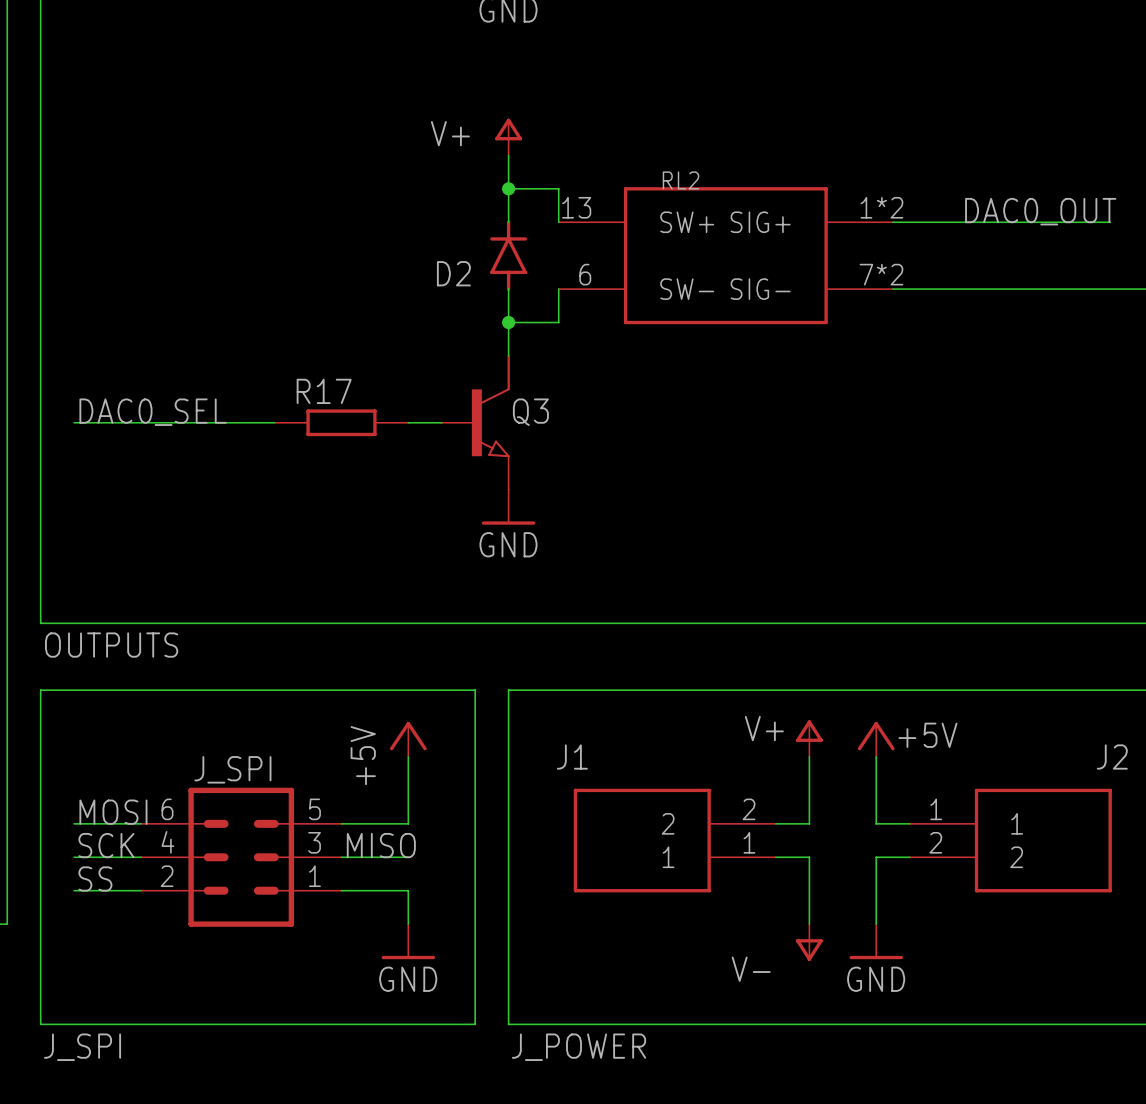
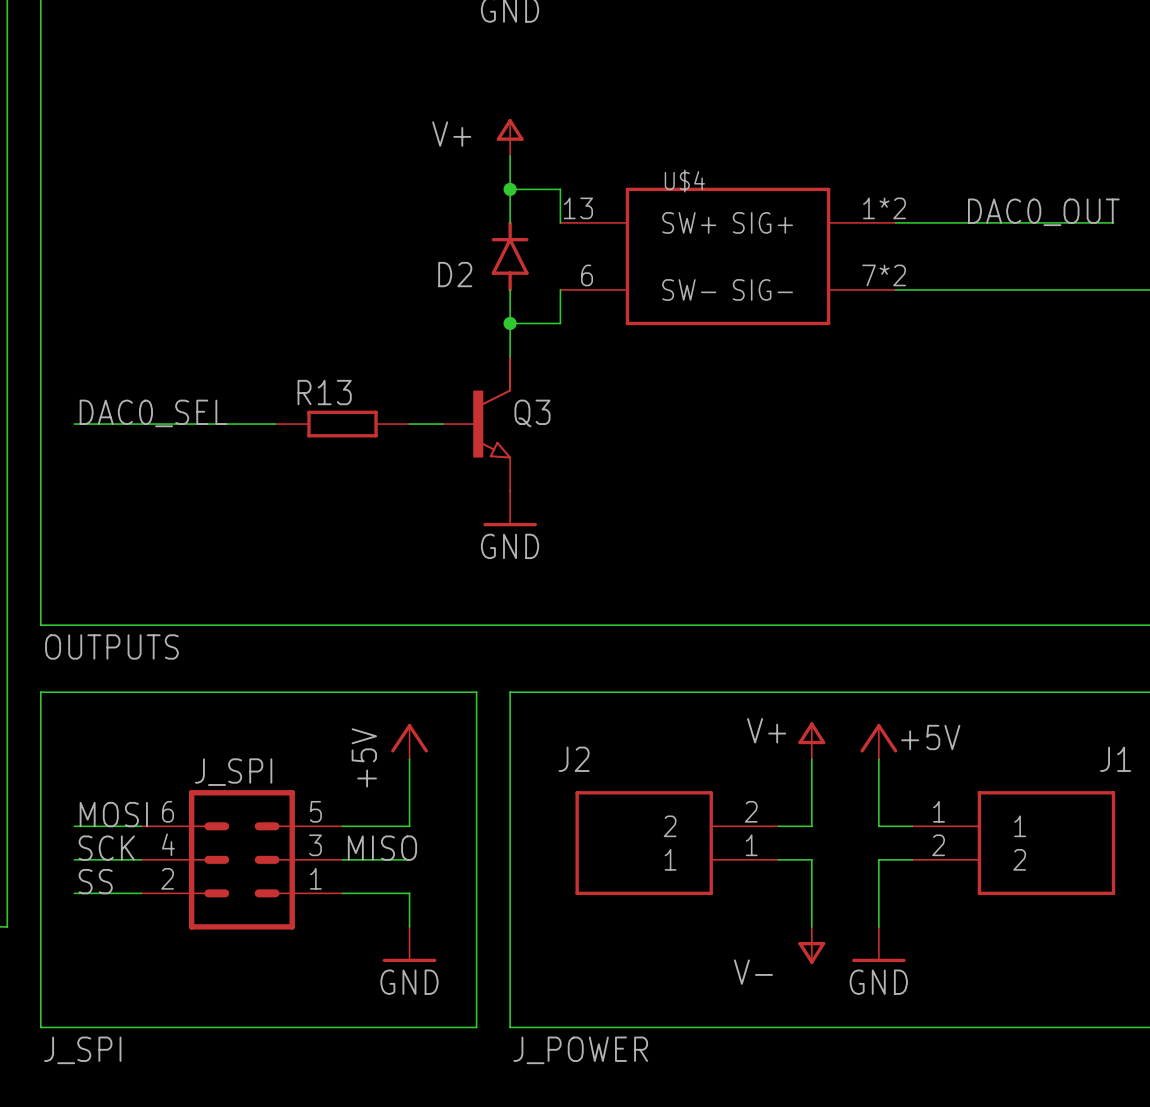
RL2 name: RL2 (681, 180) -> U$4 (684, 181)
R17 name: R17 (324, 391) -> R13 (324, 392)
J1 name: J1 (572, 757) -> J2 (574, 759)
J2 name: J2 (1112, 757) -> J1 (1115, 759)

